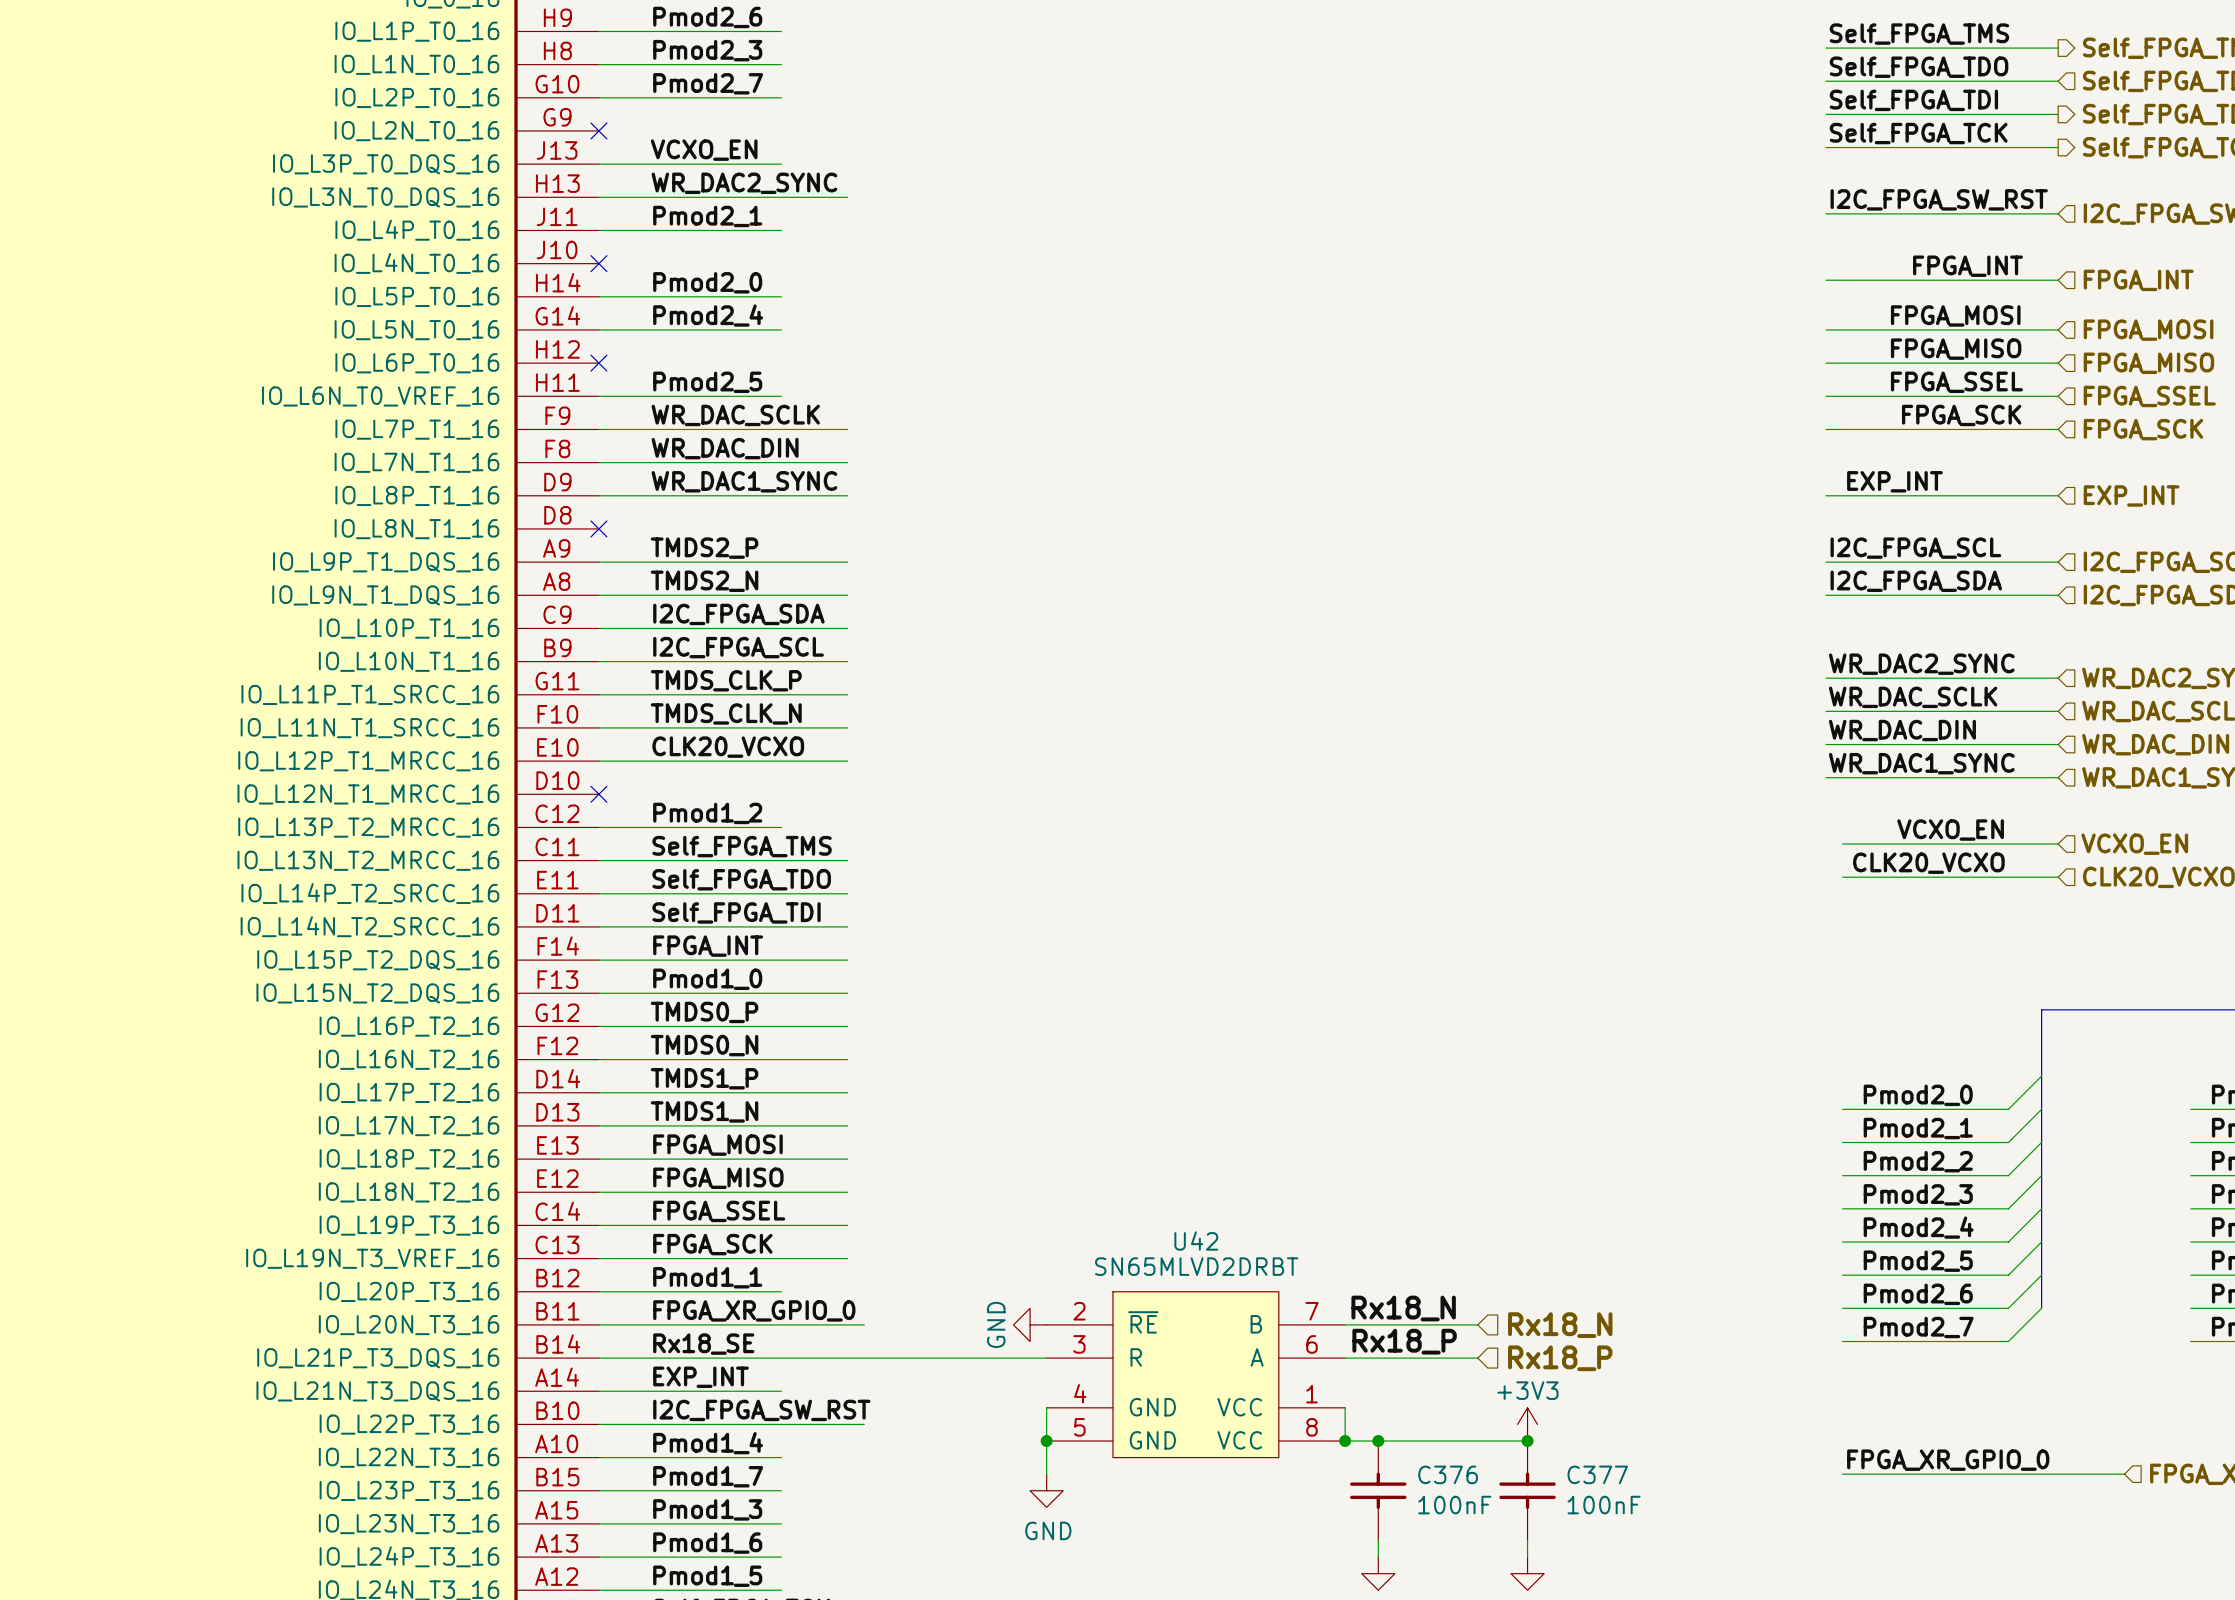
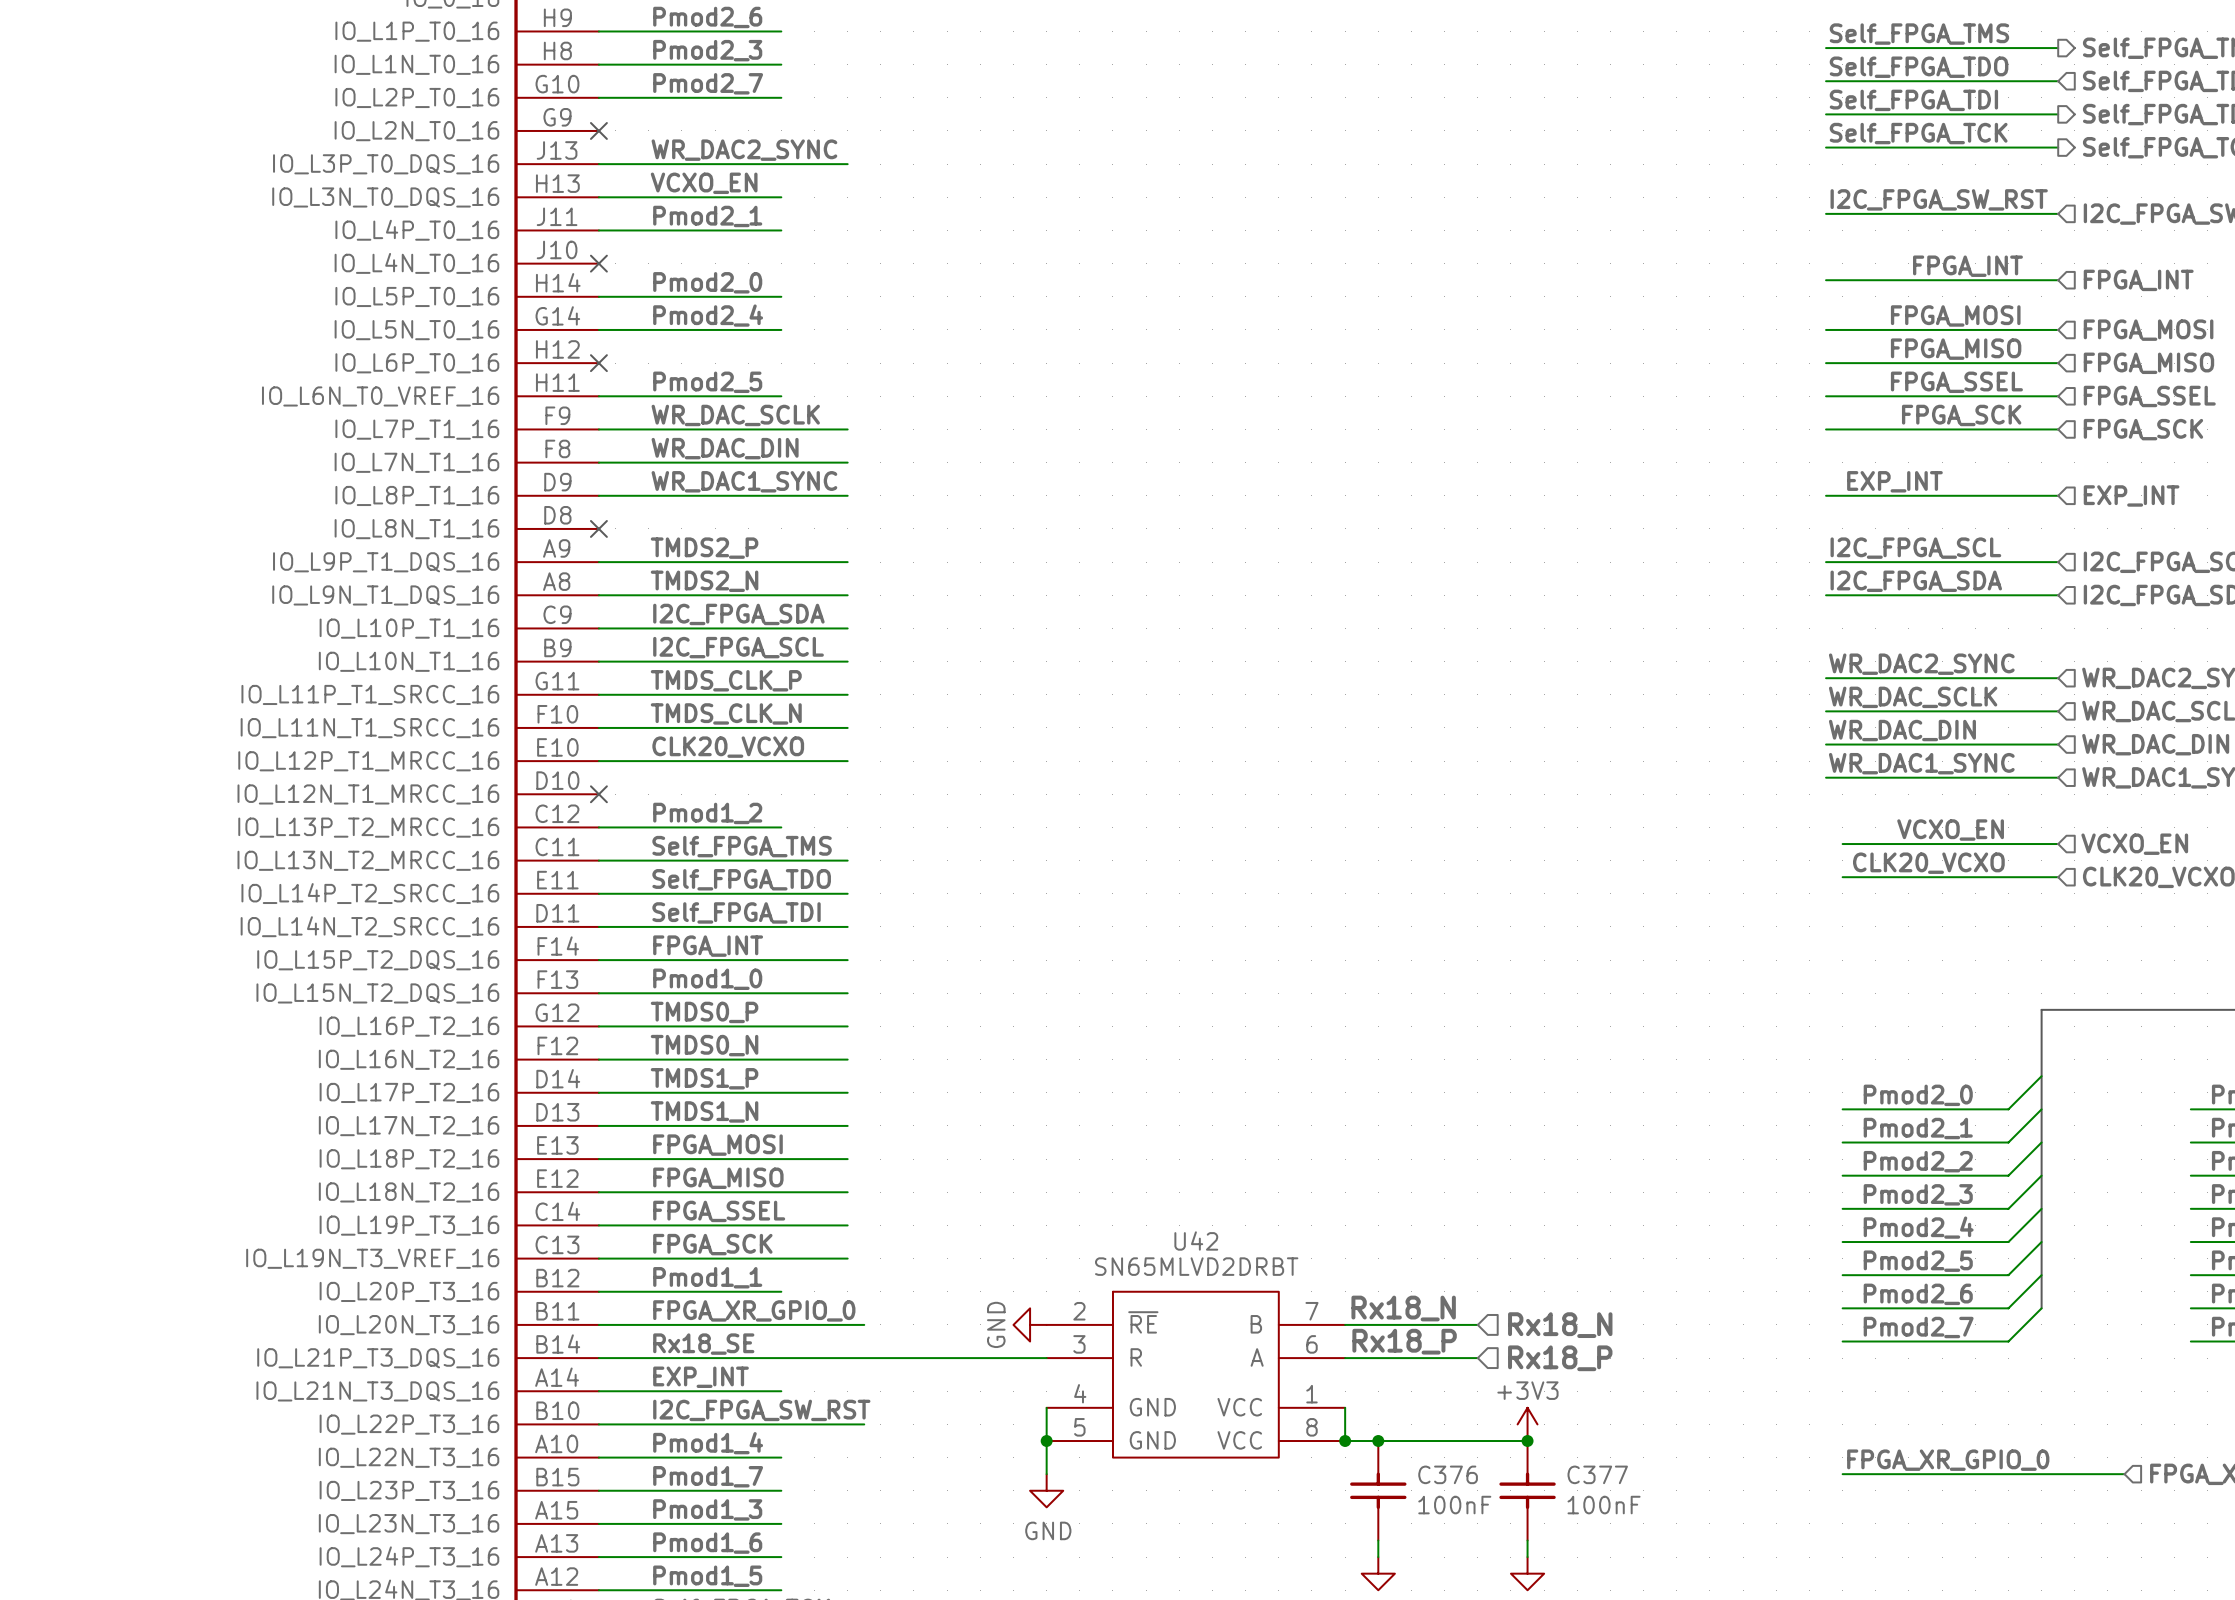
label: VCXO_EN (704, 150) -> WR_DAC2_SYNC (744, 150)
label: WR_DAC2_SYNC (744, 183) -> VCXO_EN (704, 183)
wire: (781, 197) (847, 197) -> (781, 164) (847, 164)

